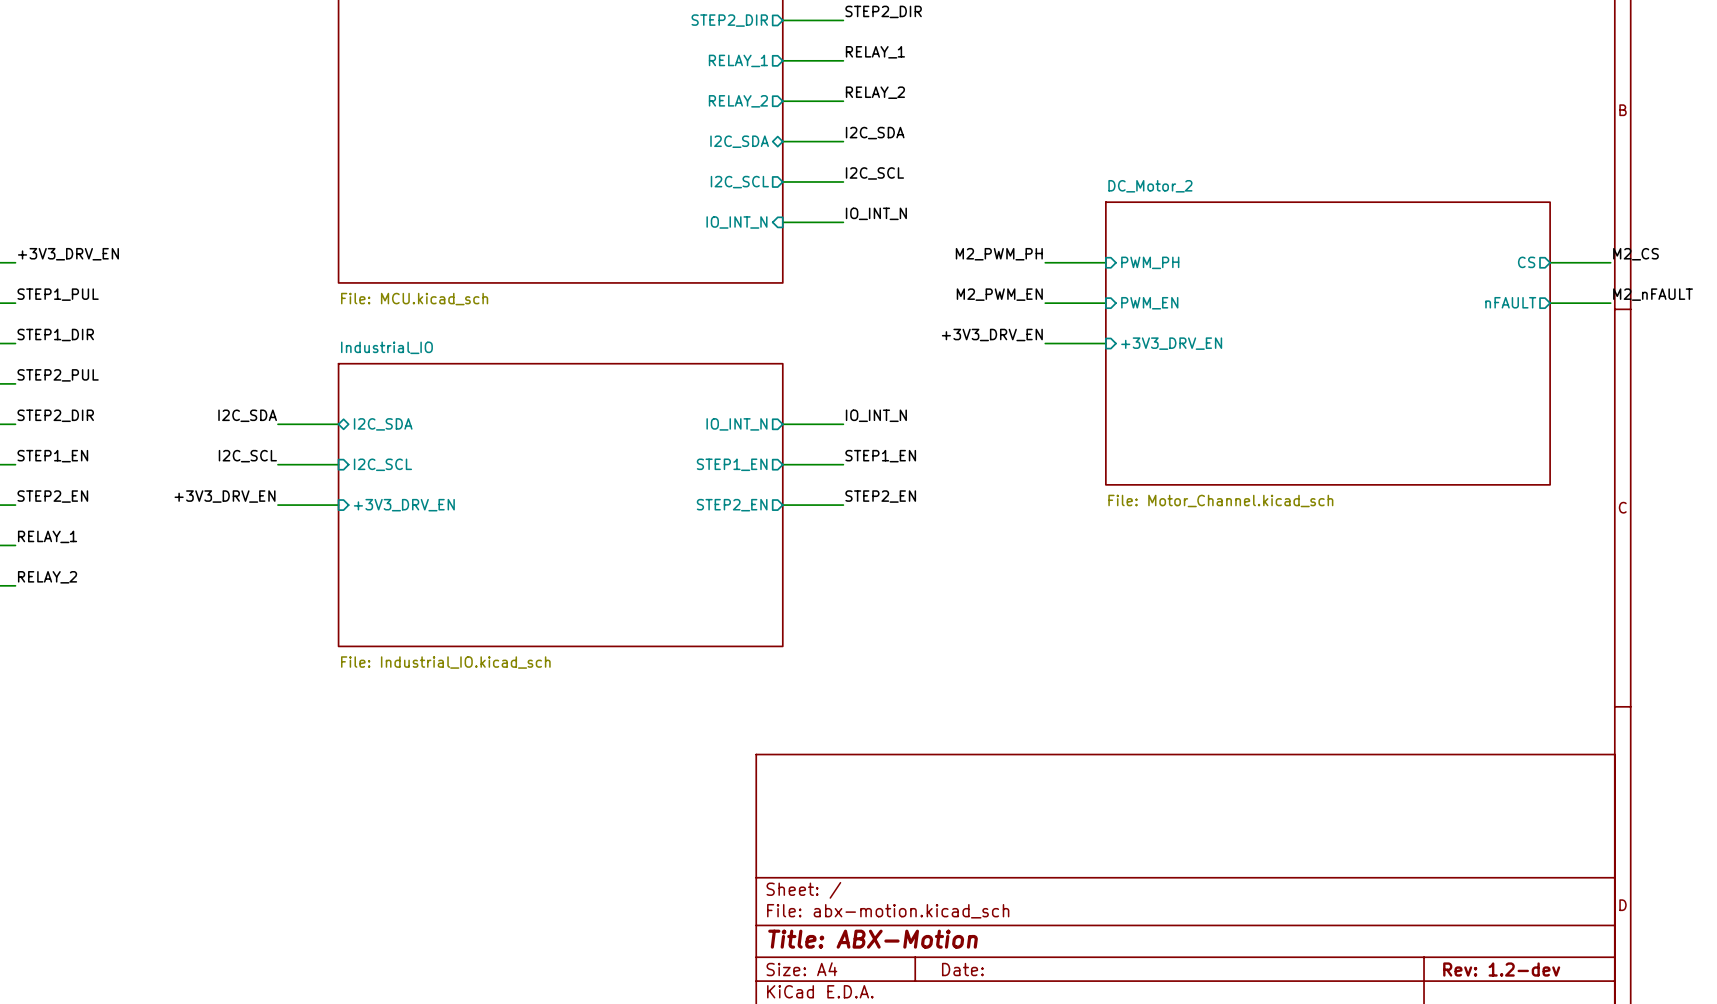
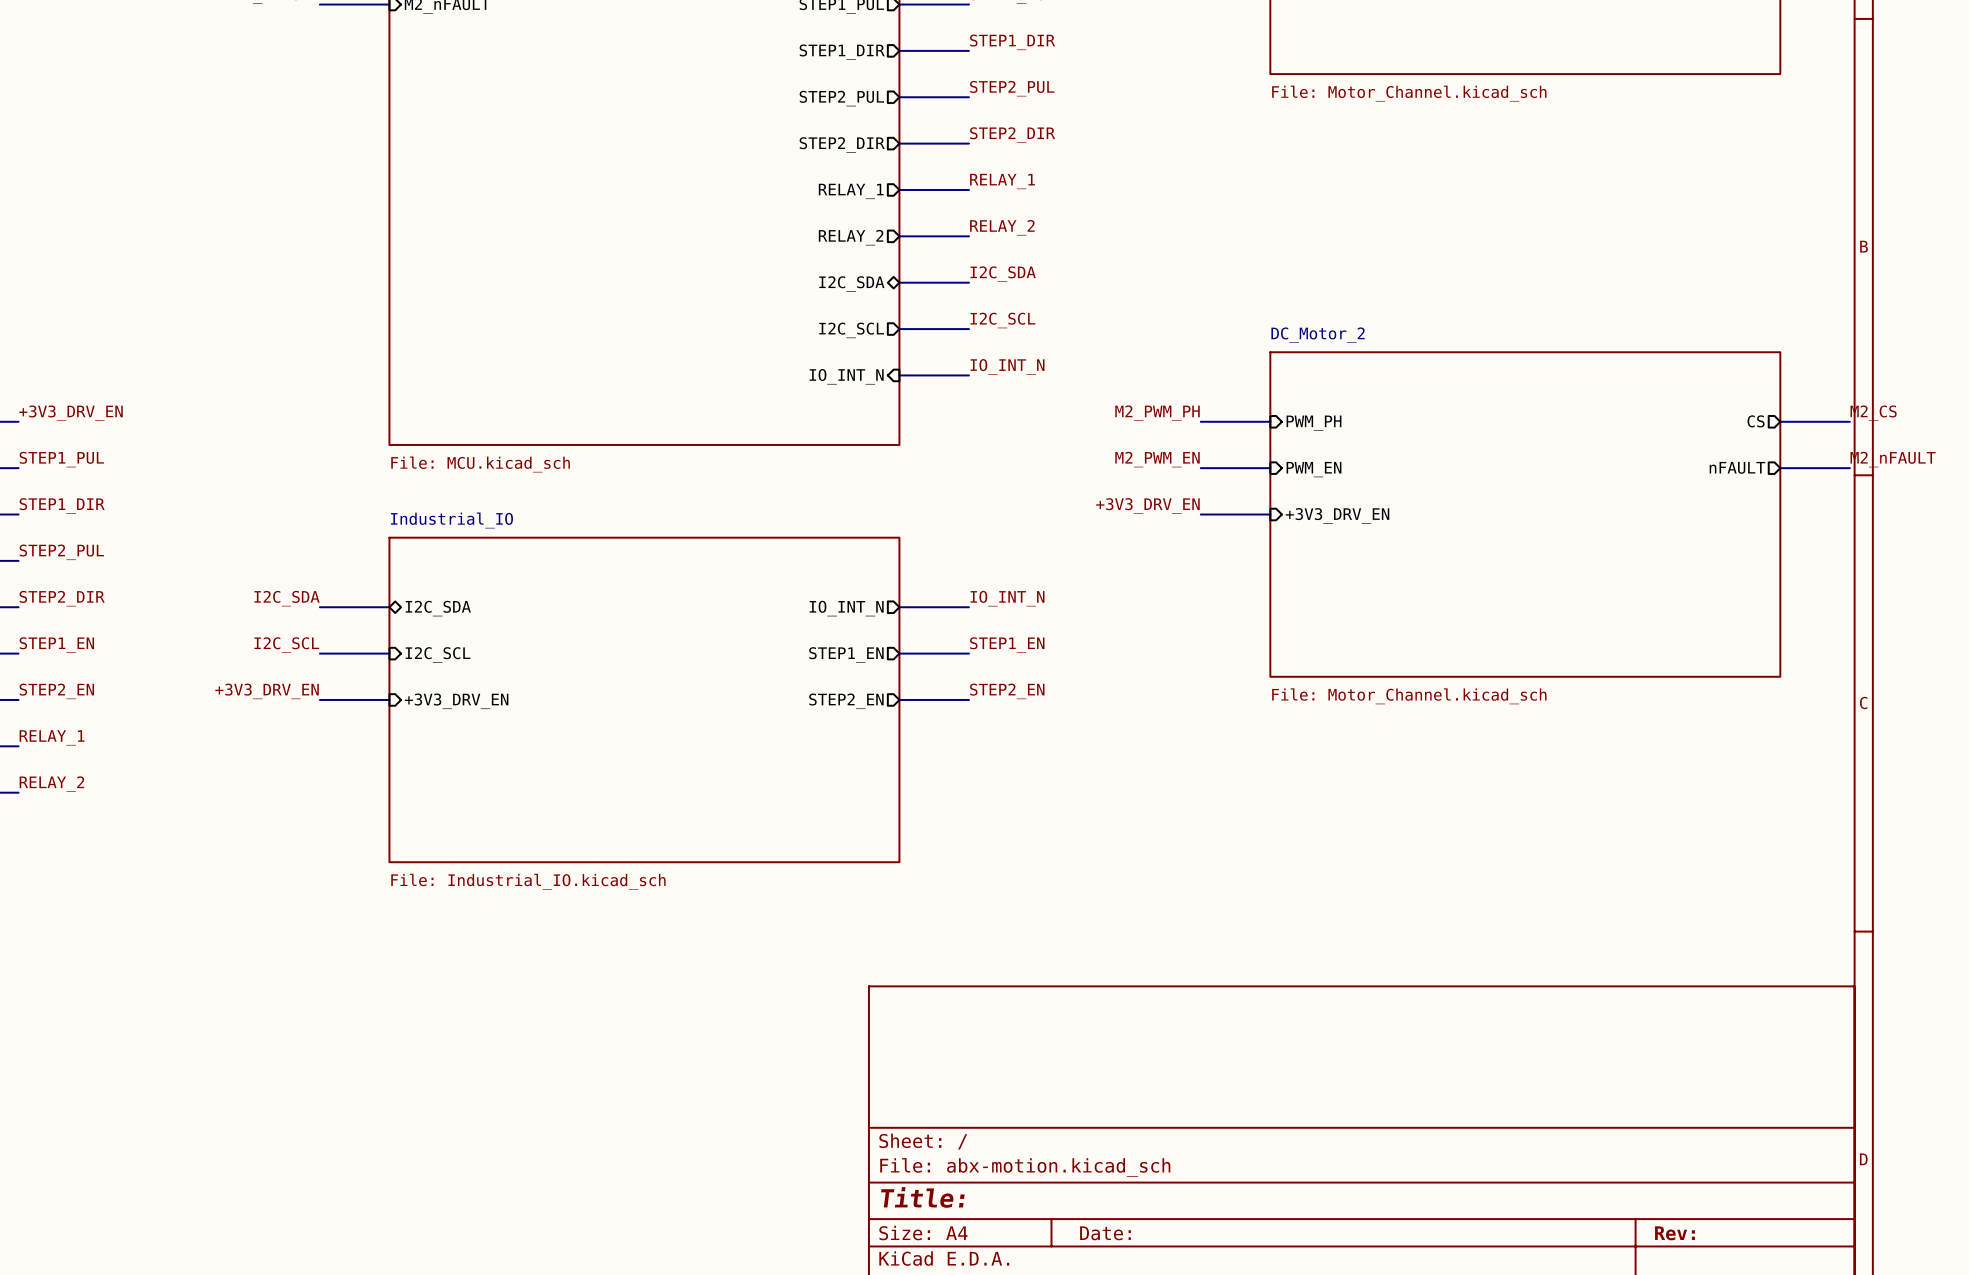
title block: Title: ABX-Motion (873, 939) -> Title: (922, 1197)
title block: Rev: 1.2-dev (1501, 969) -> Rev: (1674, 1233)

